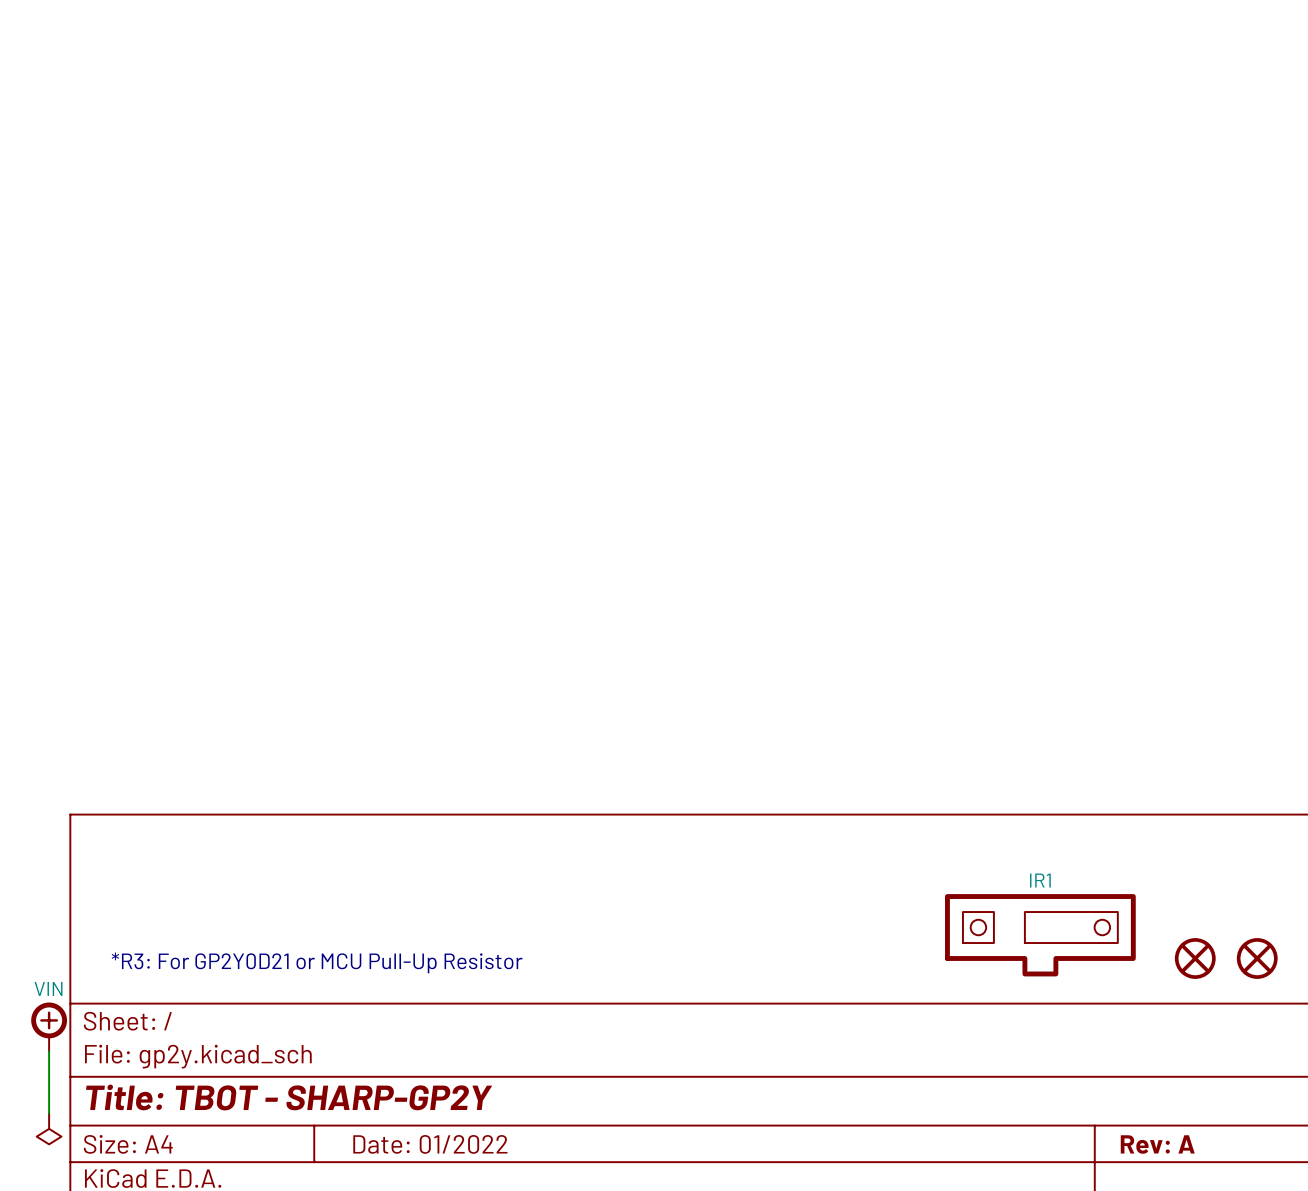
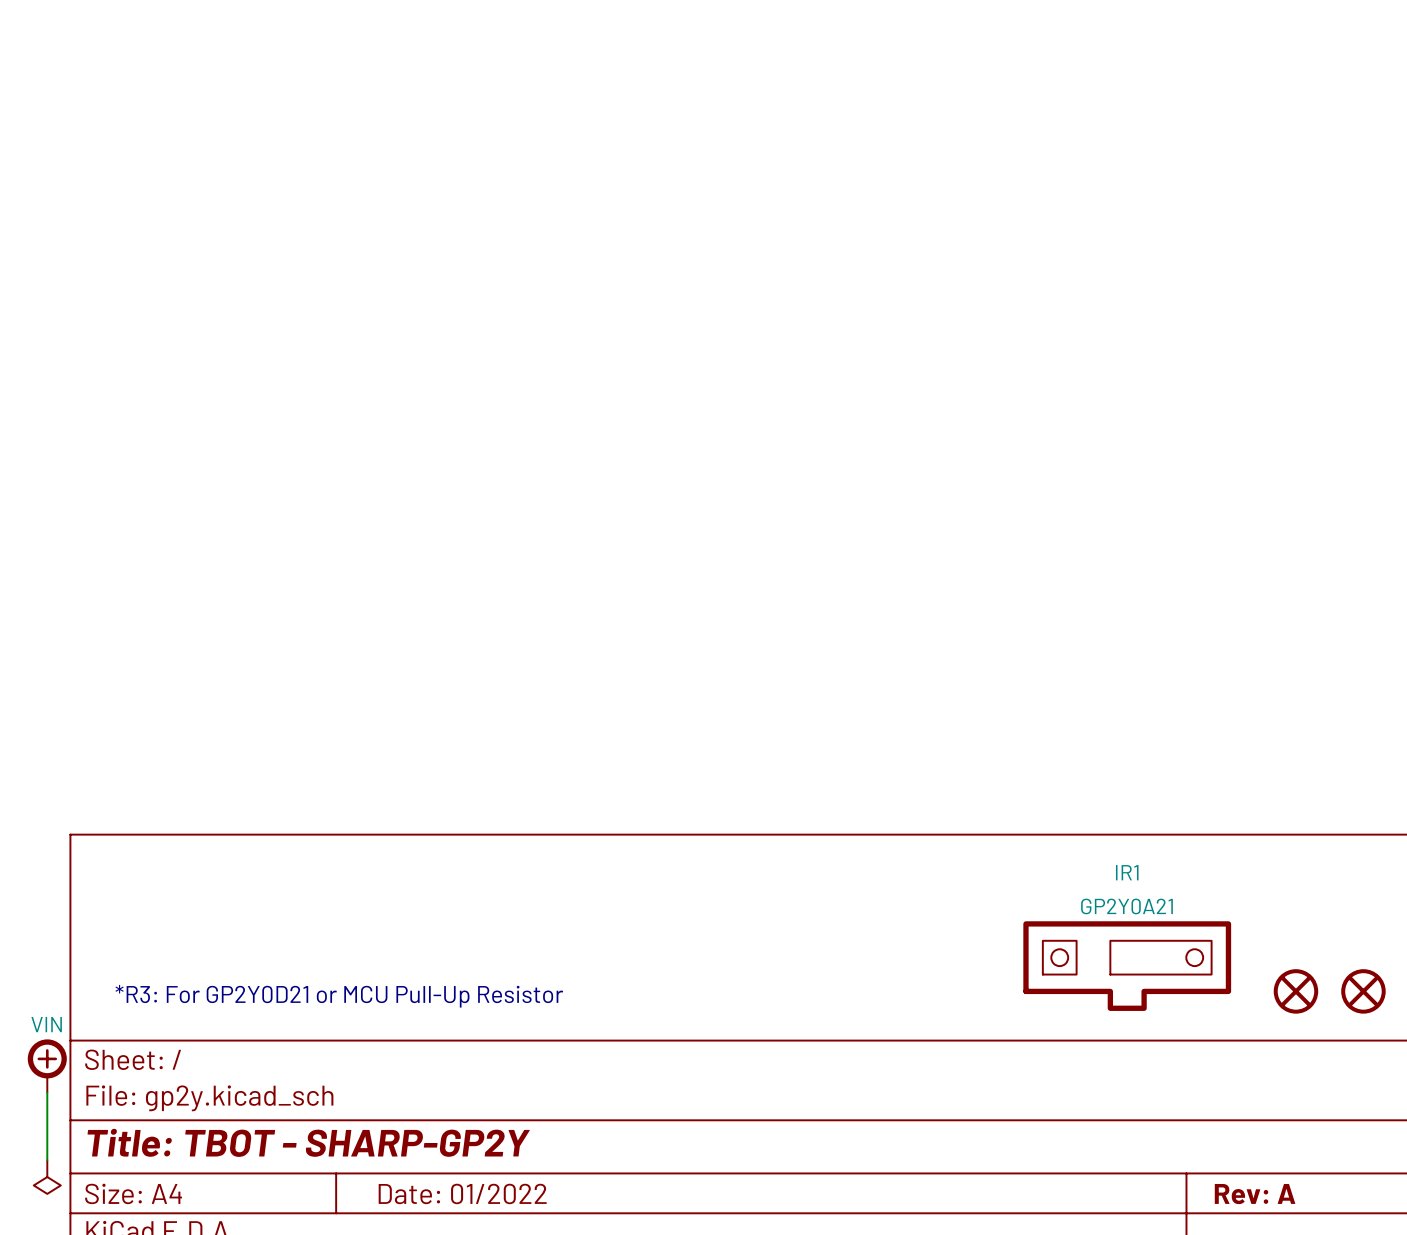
IR1 text: none -> GP2Y0A21 (1126, 906)
IR1 name position: IR1 (1040, 880) -> IR1 (1127, 872)

